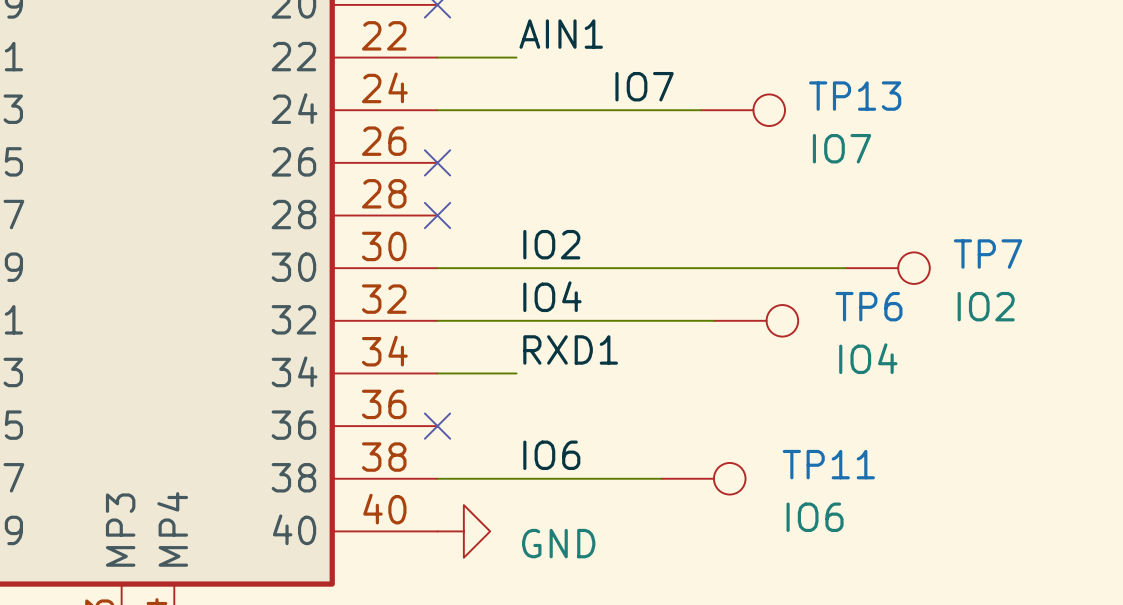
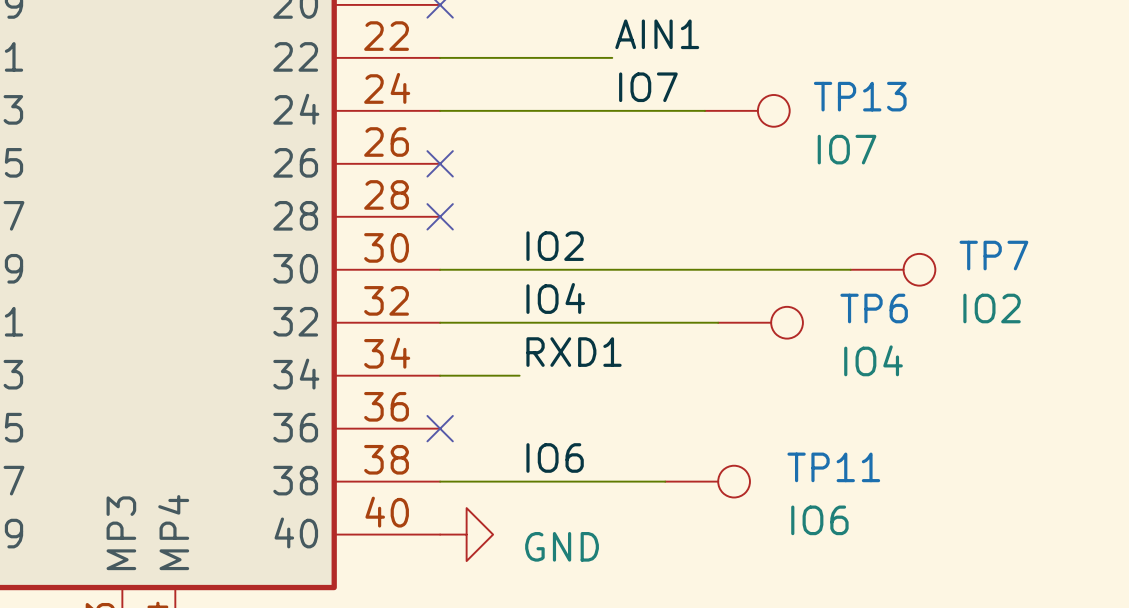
label position: AIN1 (561, 34) -> AIN1 (657, 34)
wire: none -> (519, 57) (612, 57)

